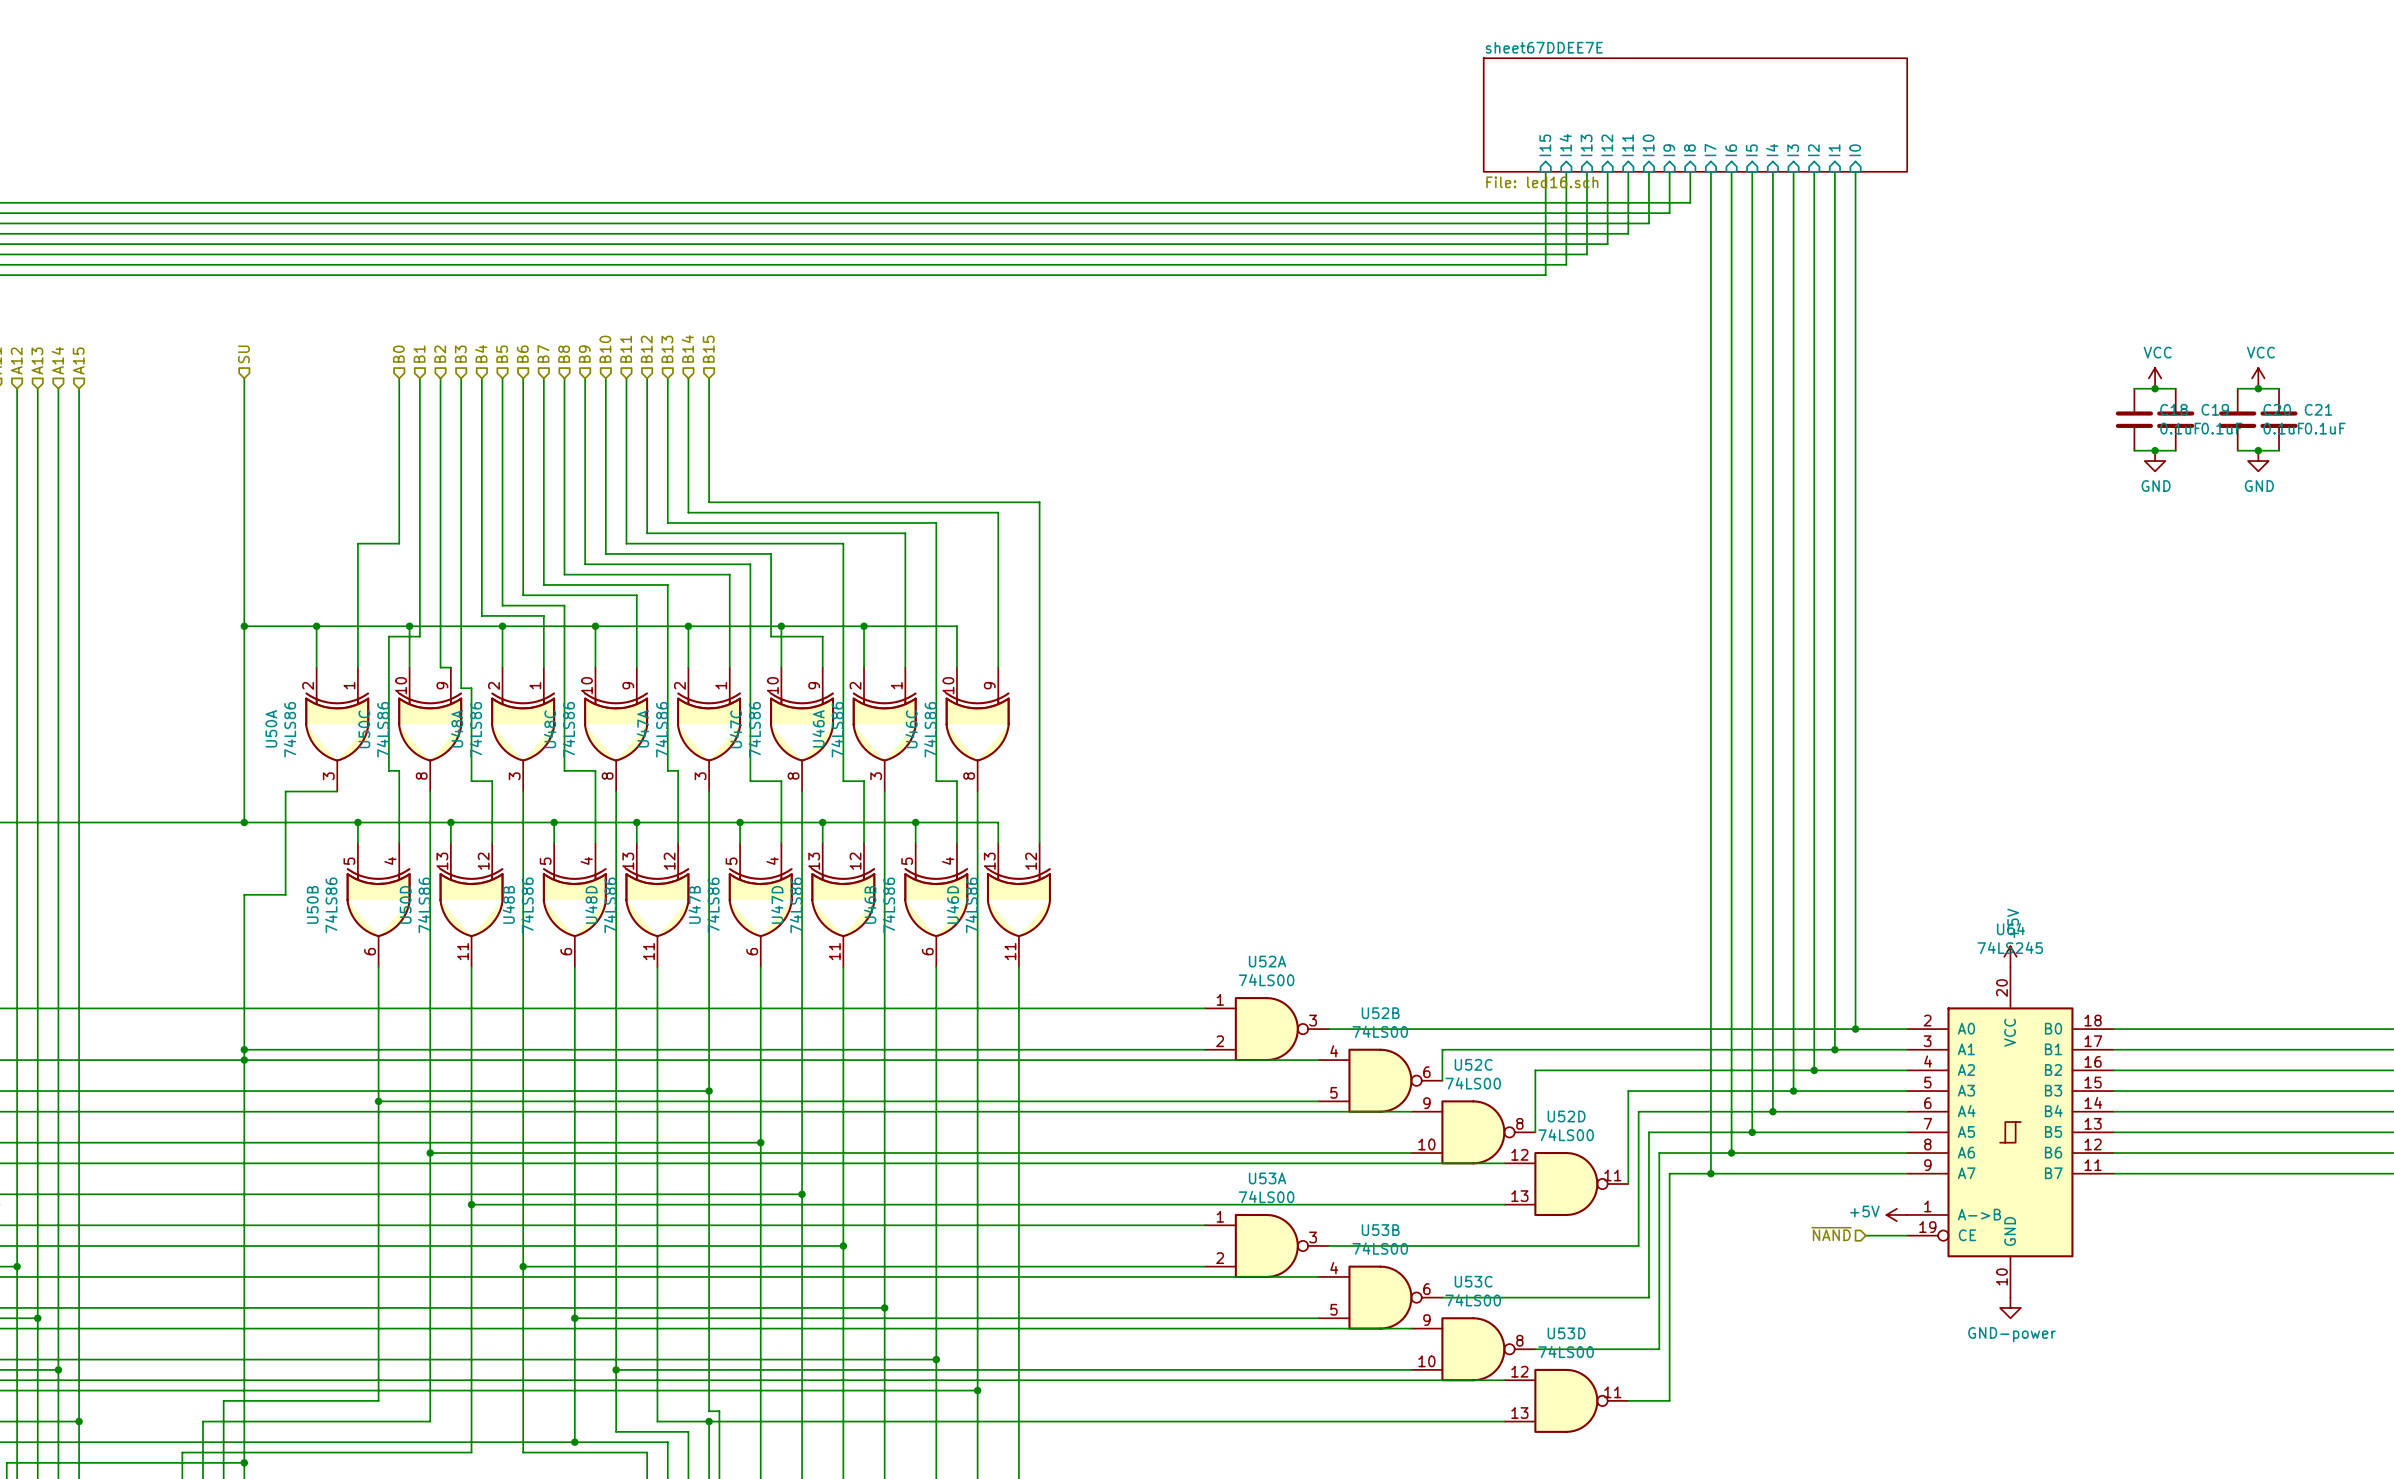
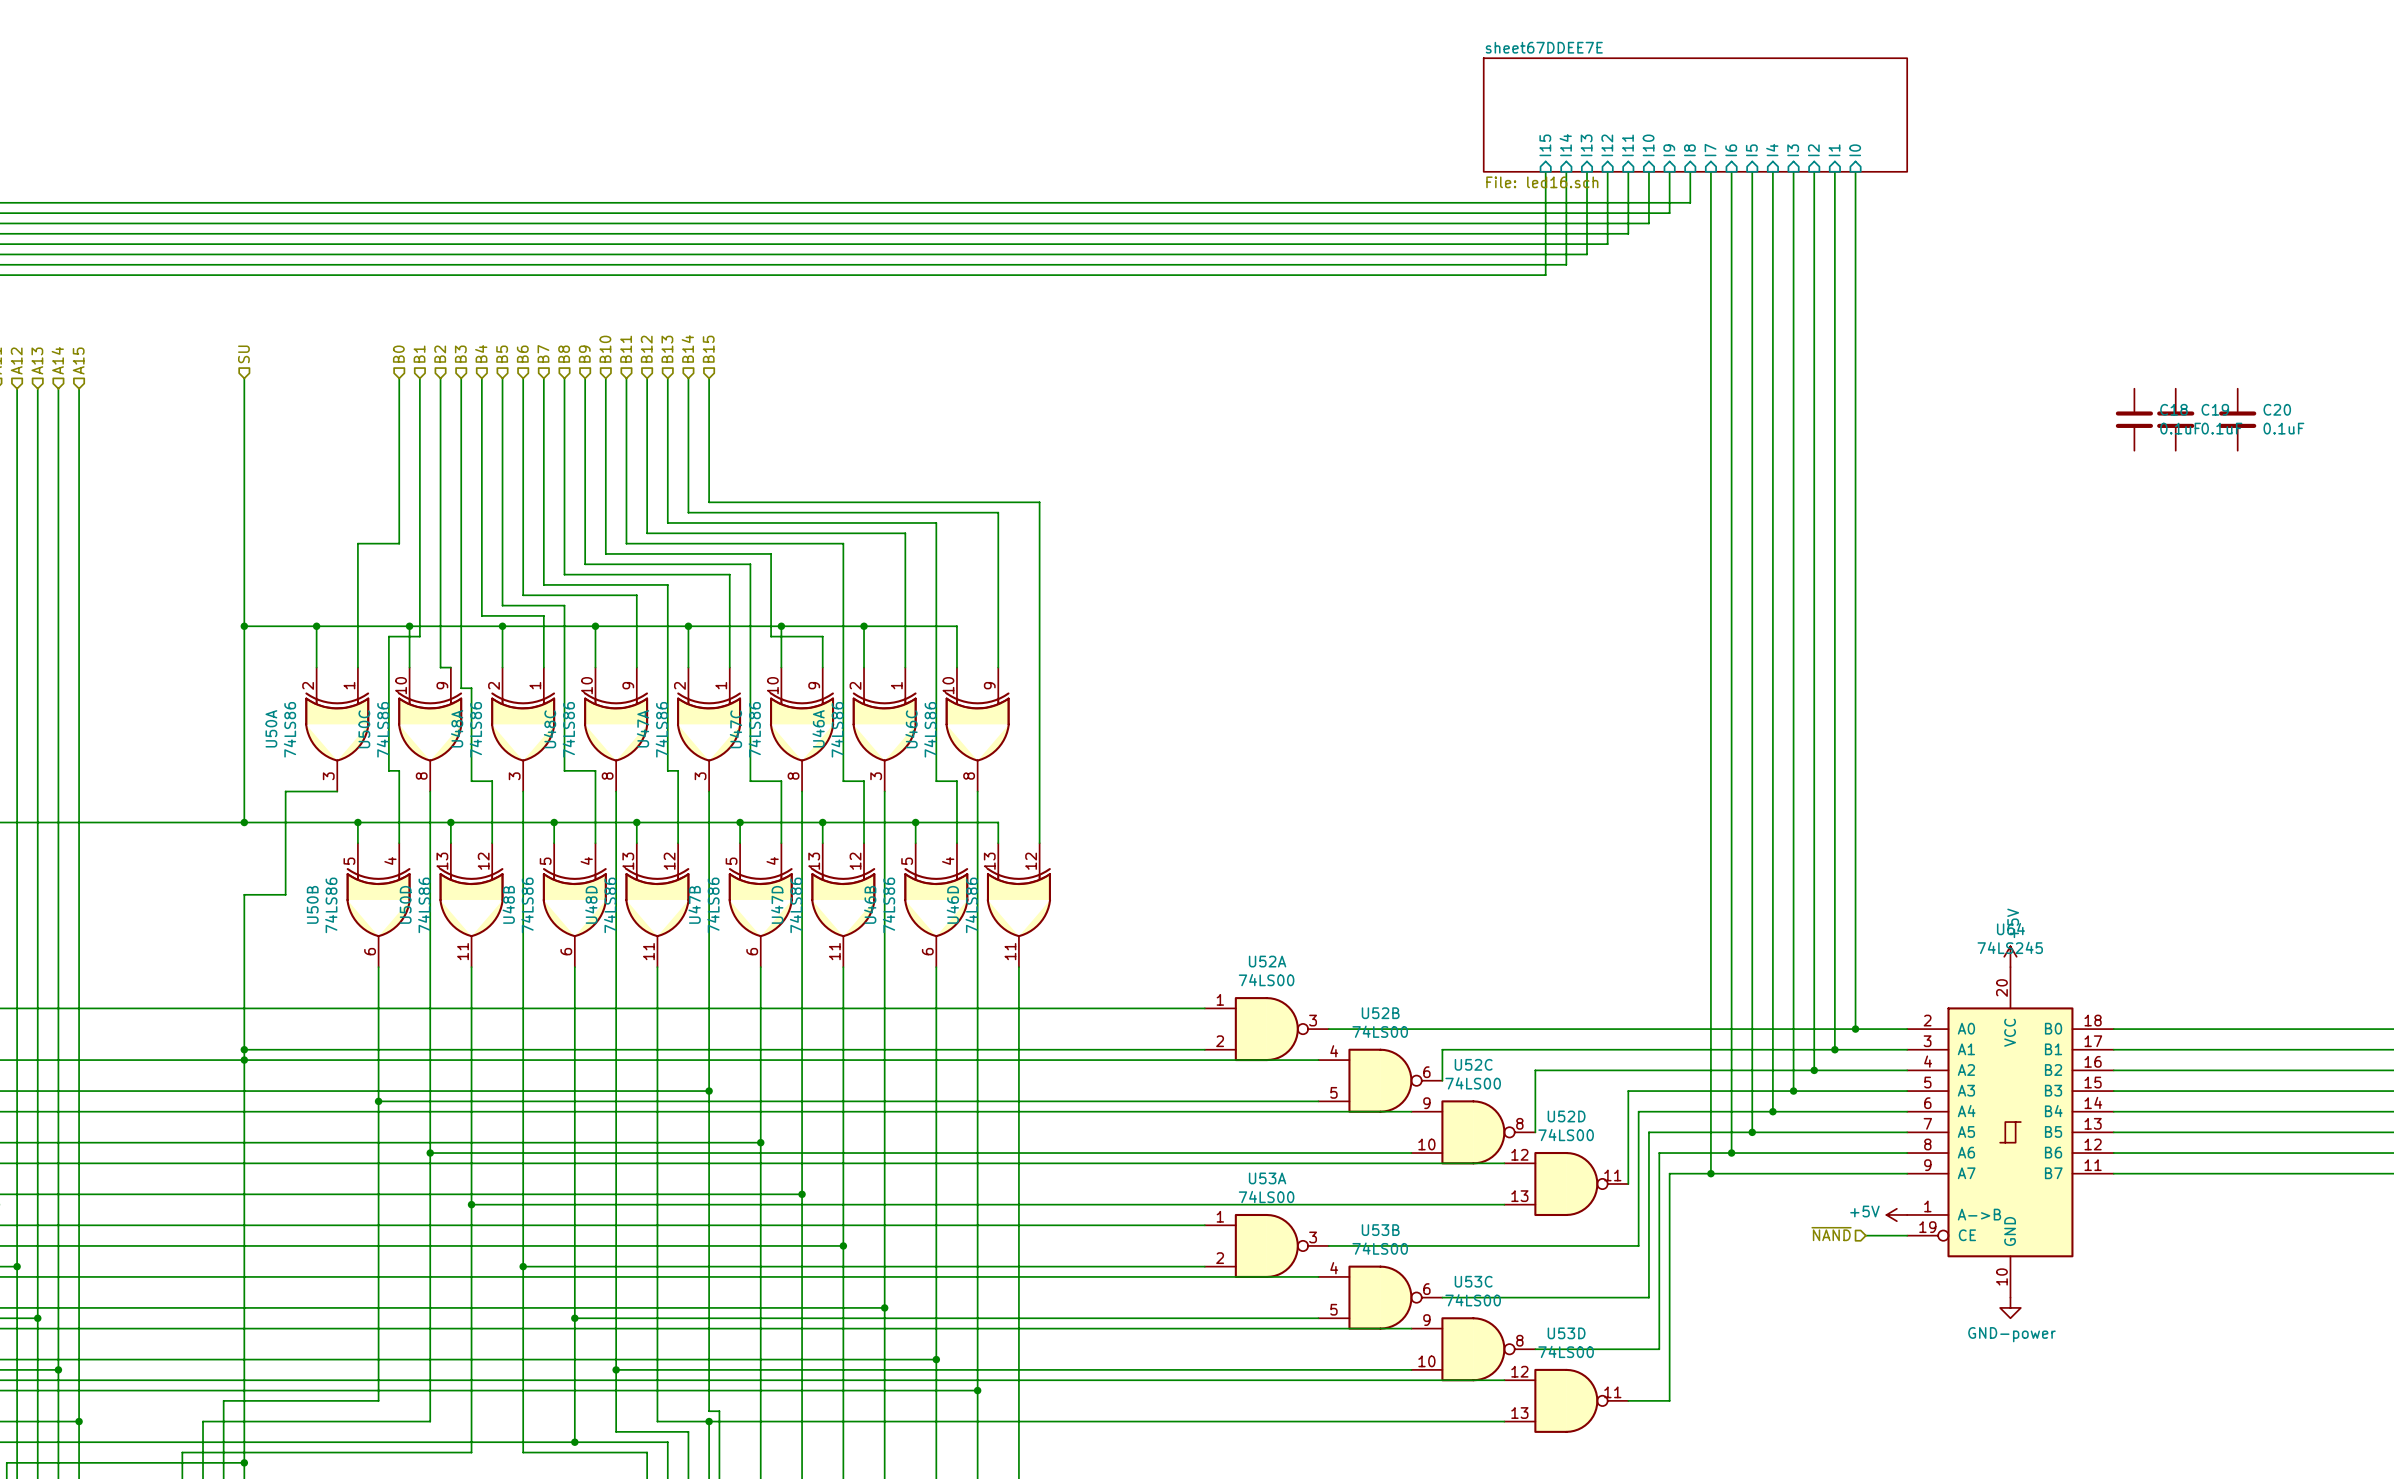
power symbol: VCC (2155, 378) -> none
power symbol: VCC (2258, 378) -> none
wire: (2134, 388) (2175, 388) -> none
junction: (2155, 388) -> none
wire: (2237, 388) (2279, 388) -> none
junction: (2258, 388) -> none
C21: 0.1uF (2279, 419) -> none
wire: (2134, 450) (2175, 450) -> none
junction: (2155, 450) -> none
wire: (2237, 450) (2279, 450) -> none
junction: (2258, 450) -> none
power symbol: GND (2155, 461) -> none
power symbol: GND (2258, 461) -> none

